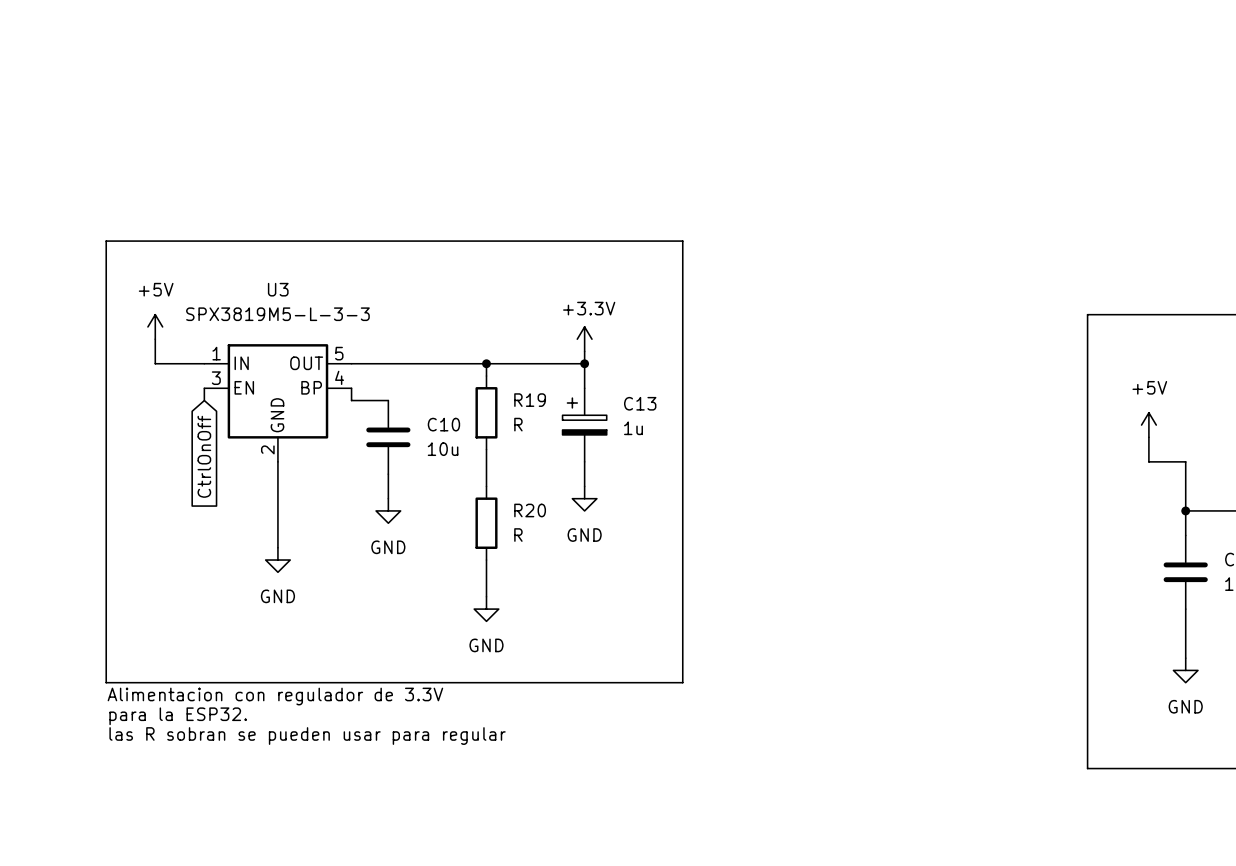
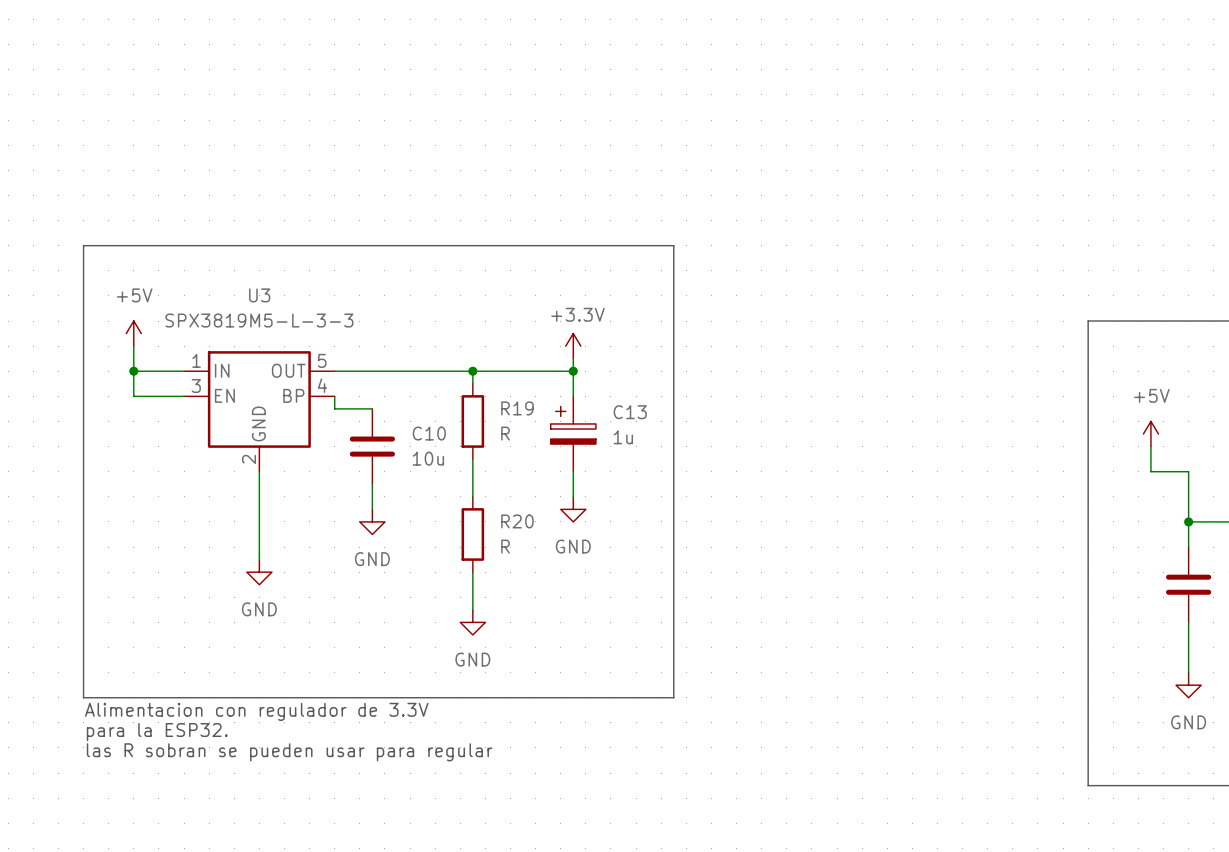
junction: none -> (133, 371)
wire: (204, 388) (204, 400) -> (184, 396) (133, 396) (133, 371)
global label: CtrlOnOff (204, 456) -> none

